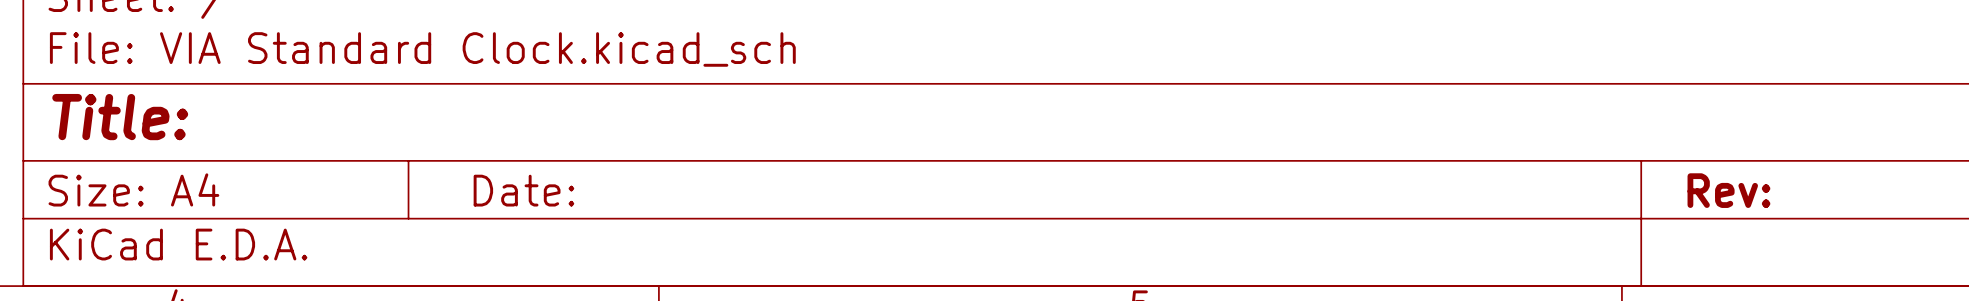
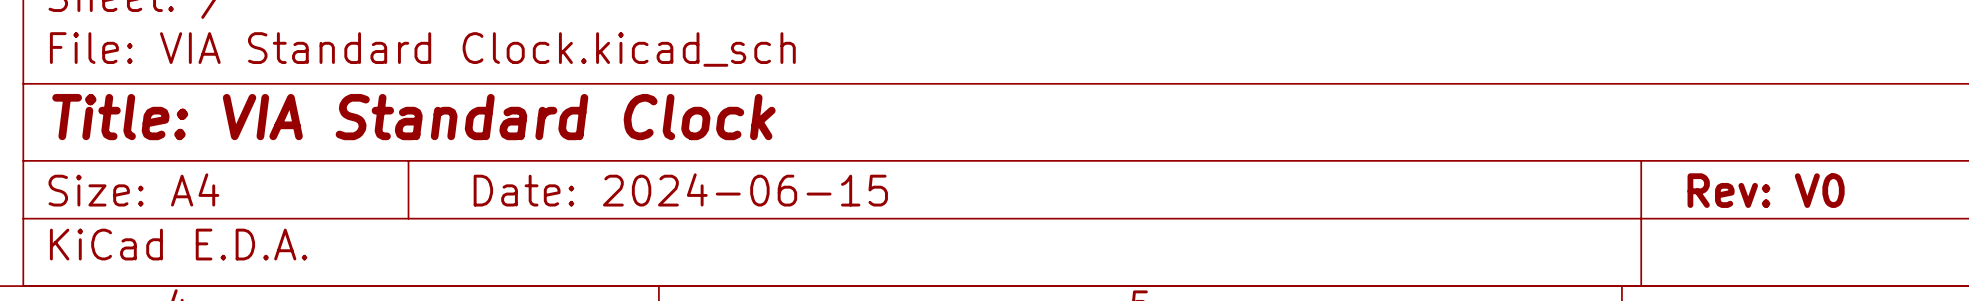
title block: Title: (120, 117) -> Title: VIA Standard Clock (413, 117)
title block: Date: (523, 190) -> Date: 2024-06-15 (680, 189)
title block: Rev: (1728, 190) -> Rev: V0 (1766, 190)

